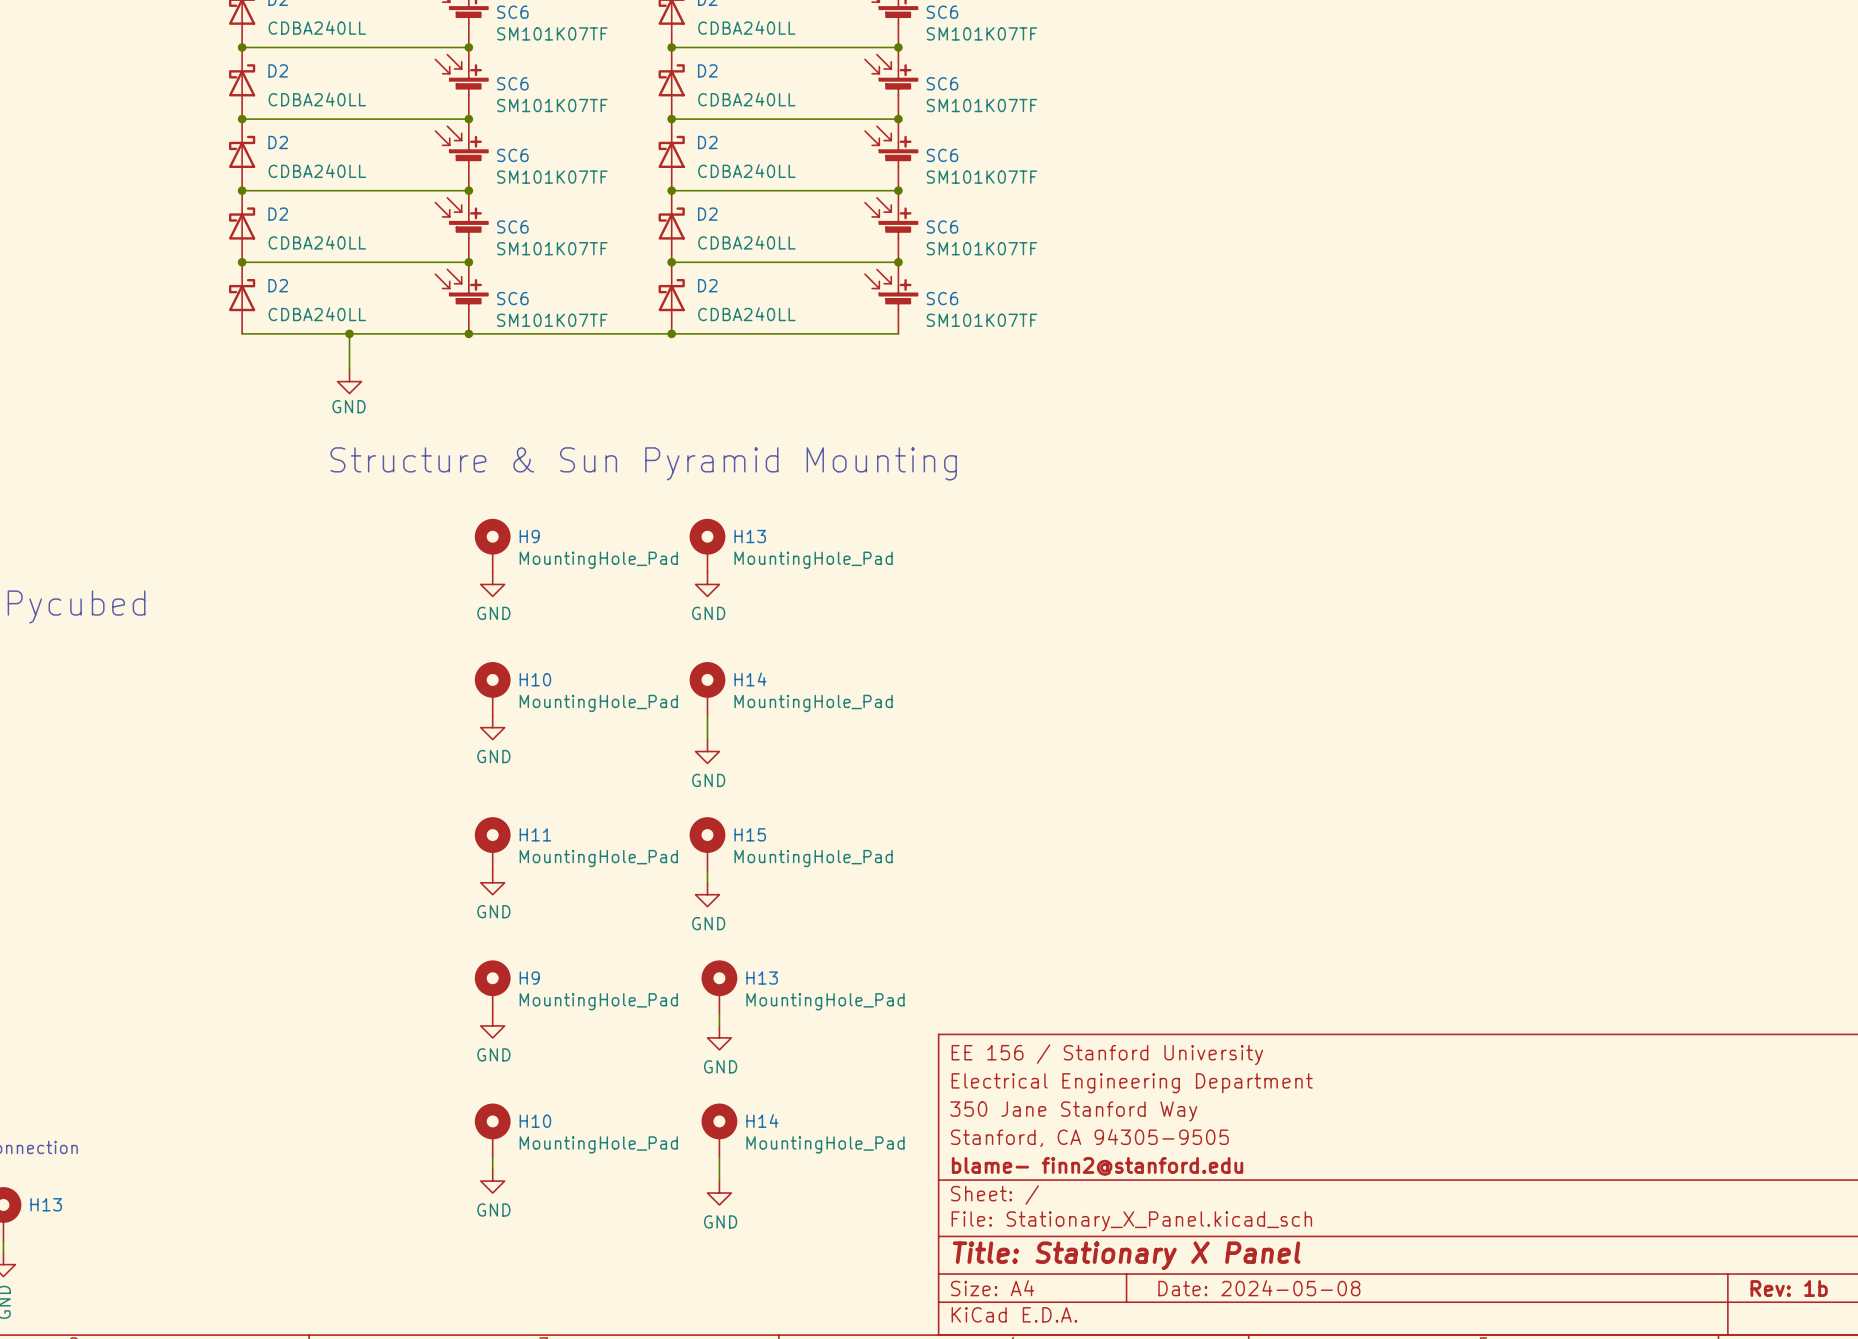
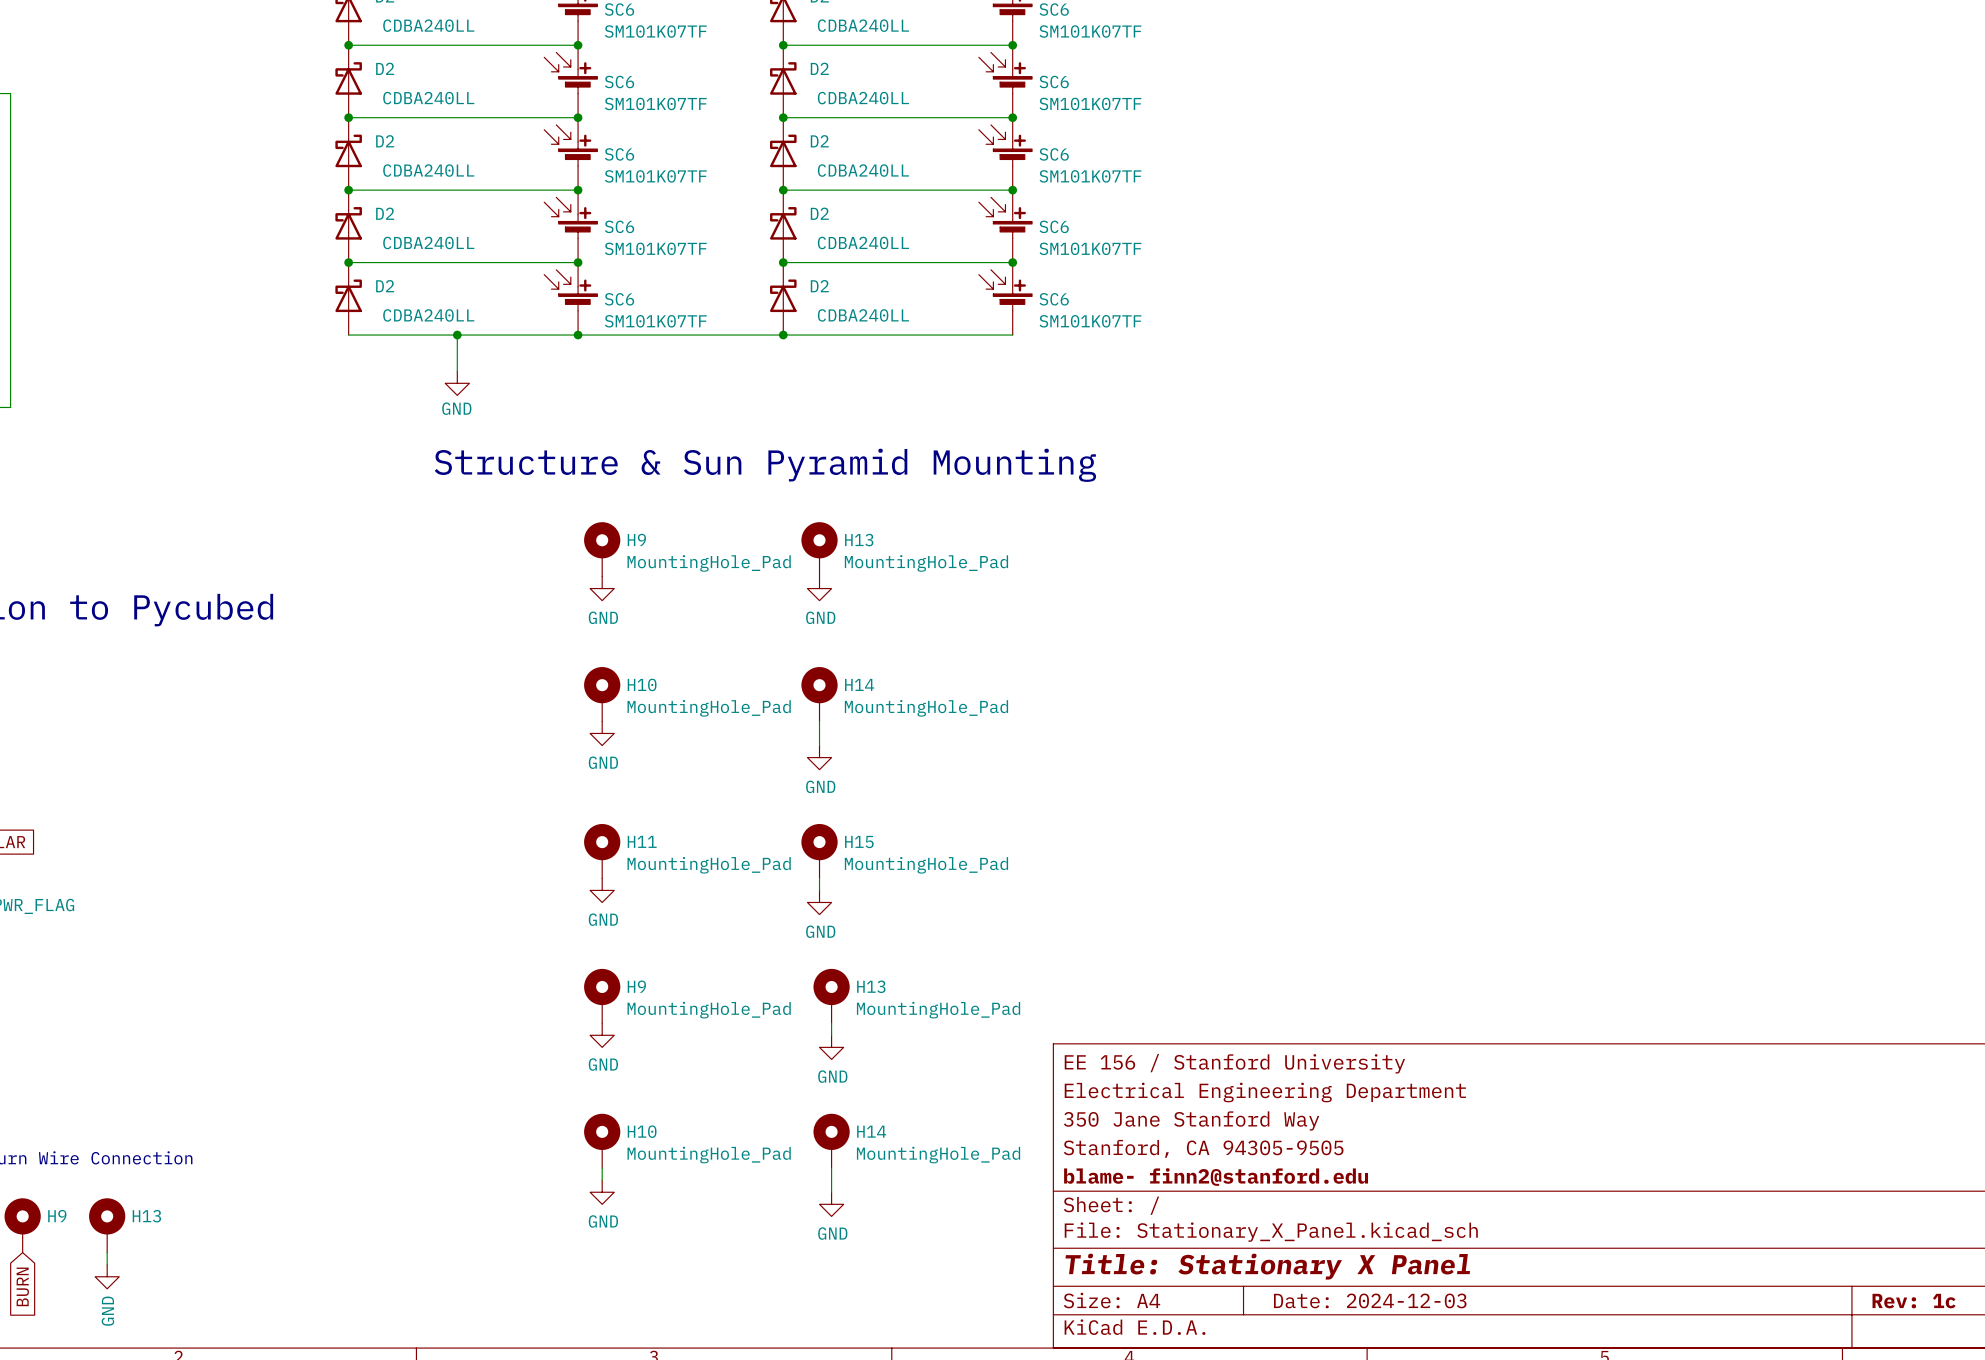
title block: Date: 2024-05-08 (1259, 1288) -> Date: 2024-12-03 (1370, 1300)
title block: Rev: 1b (1789, 1288) -> Rev: 1c (1914, 1301)

